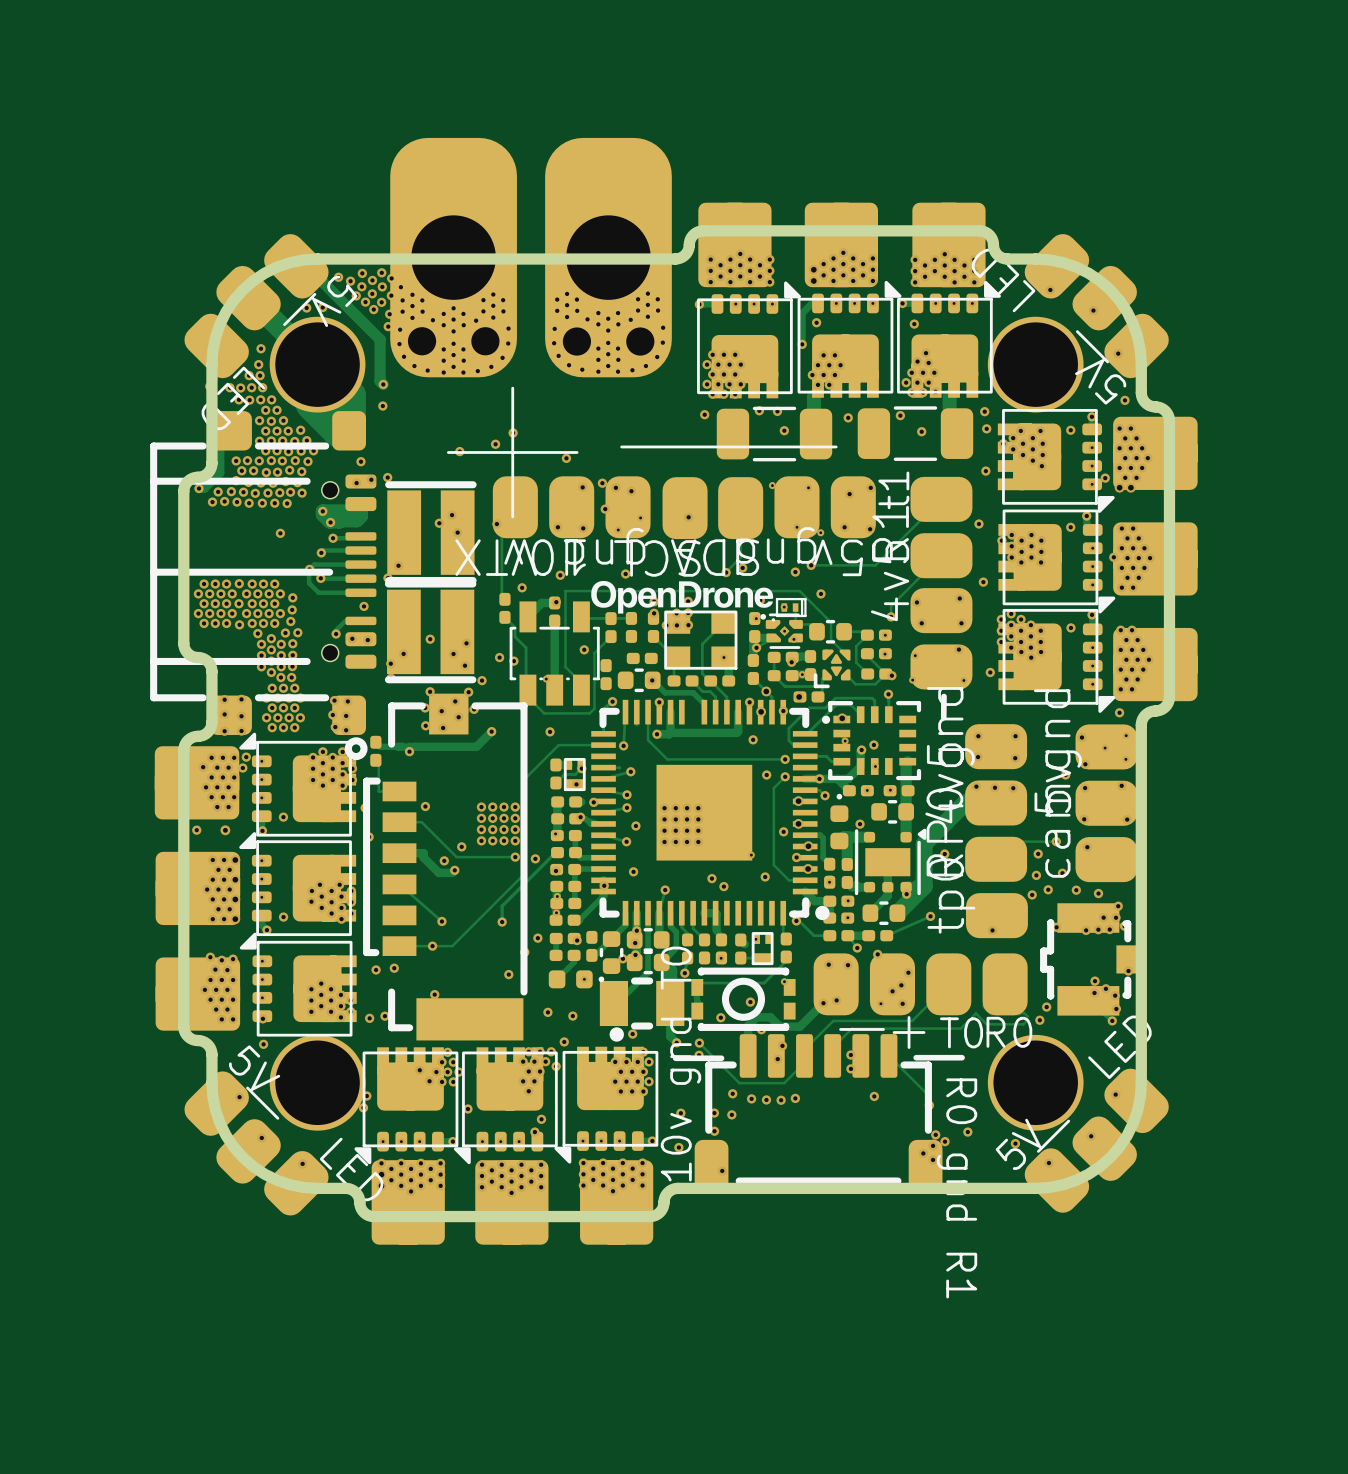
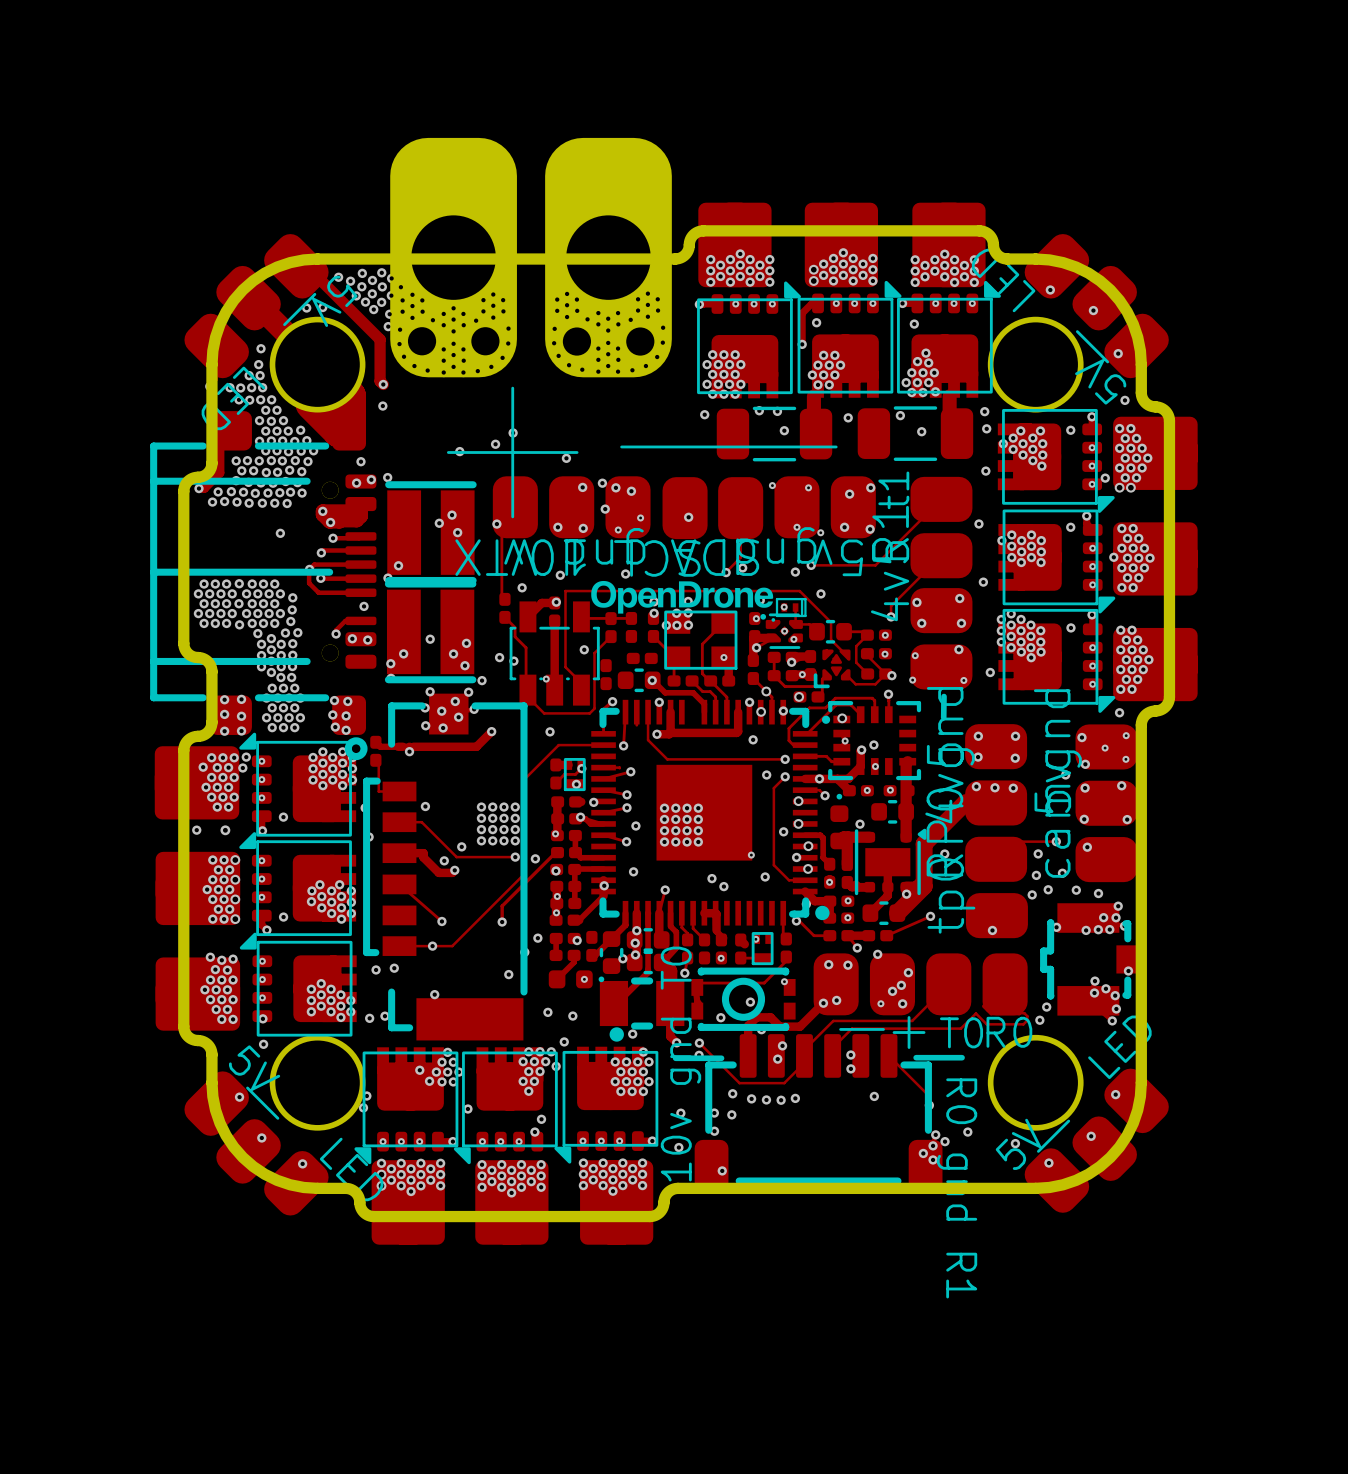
part footprint: [150, 411, 377, 735] -> [150, 411, 377, 735]

